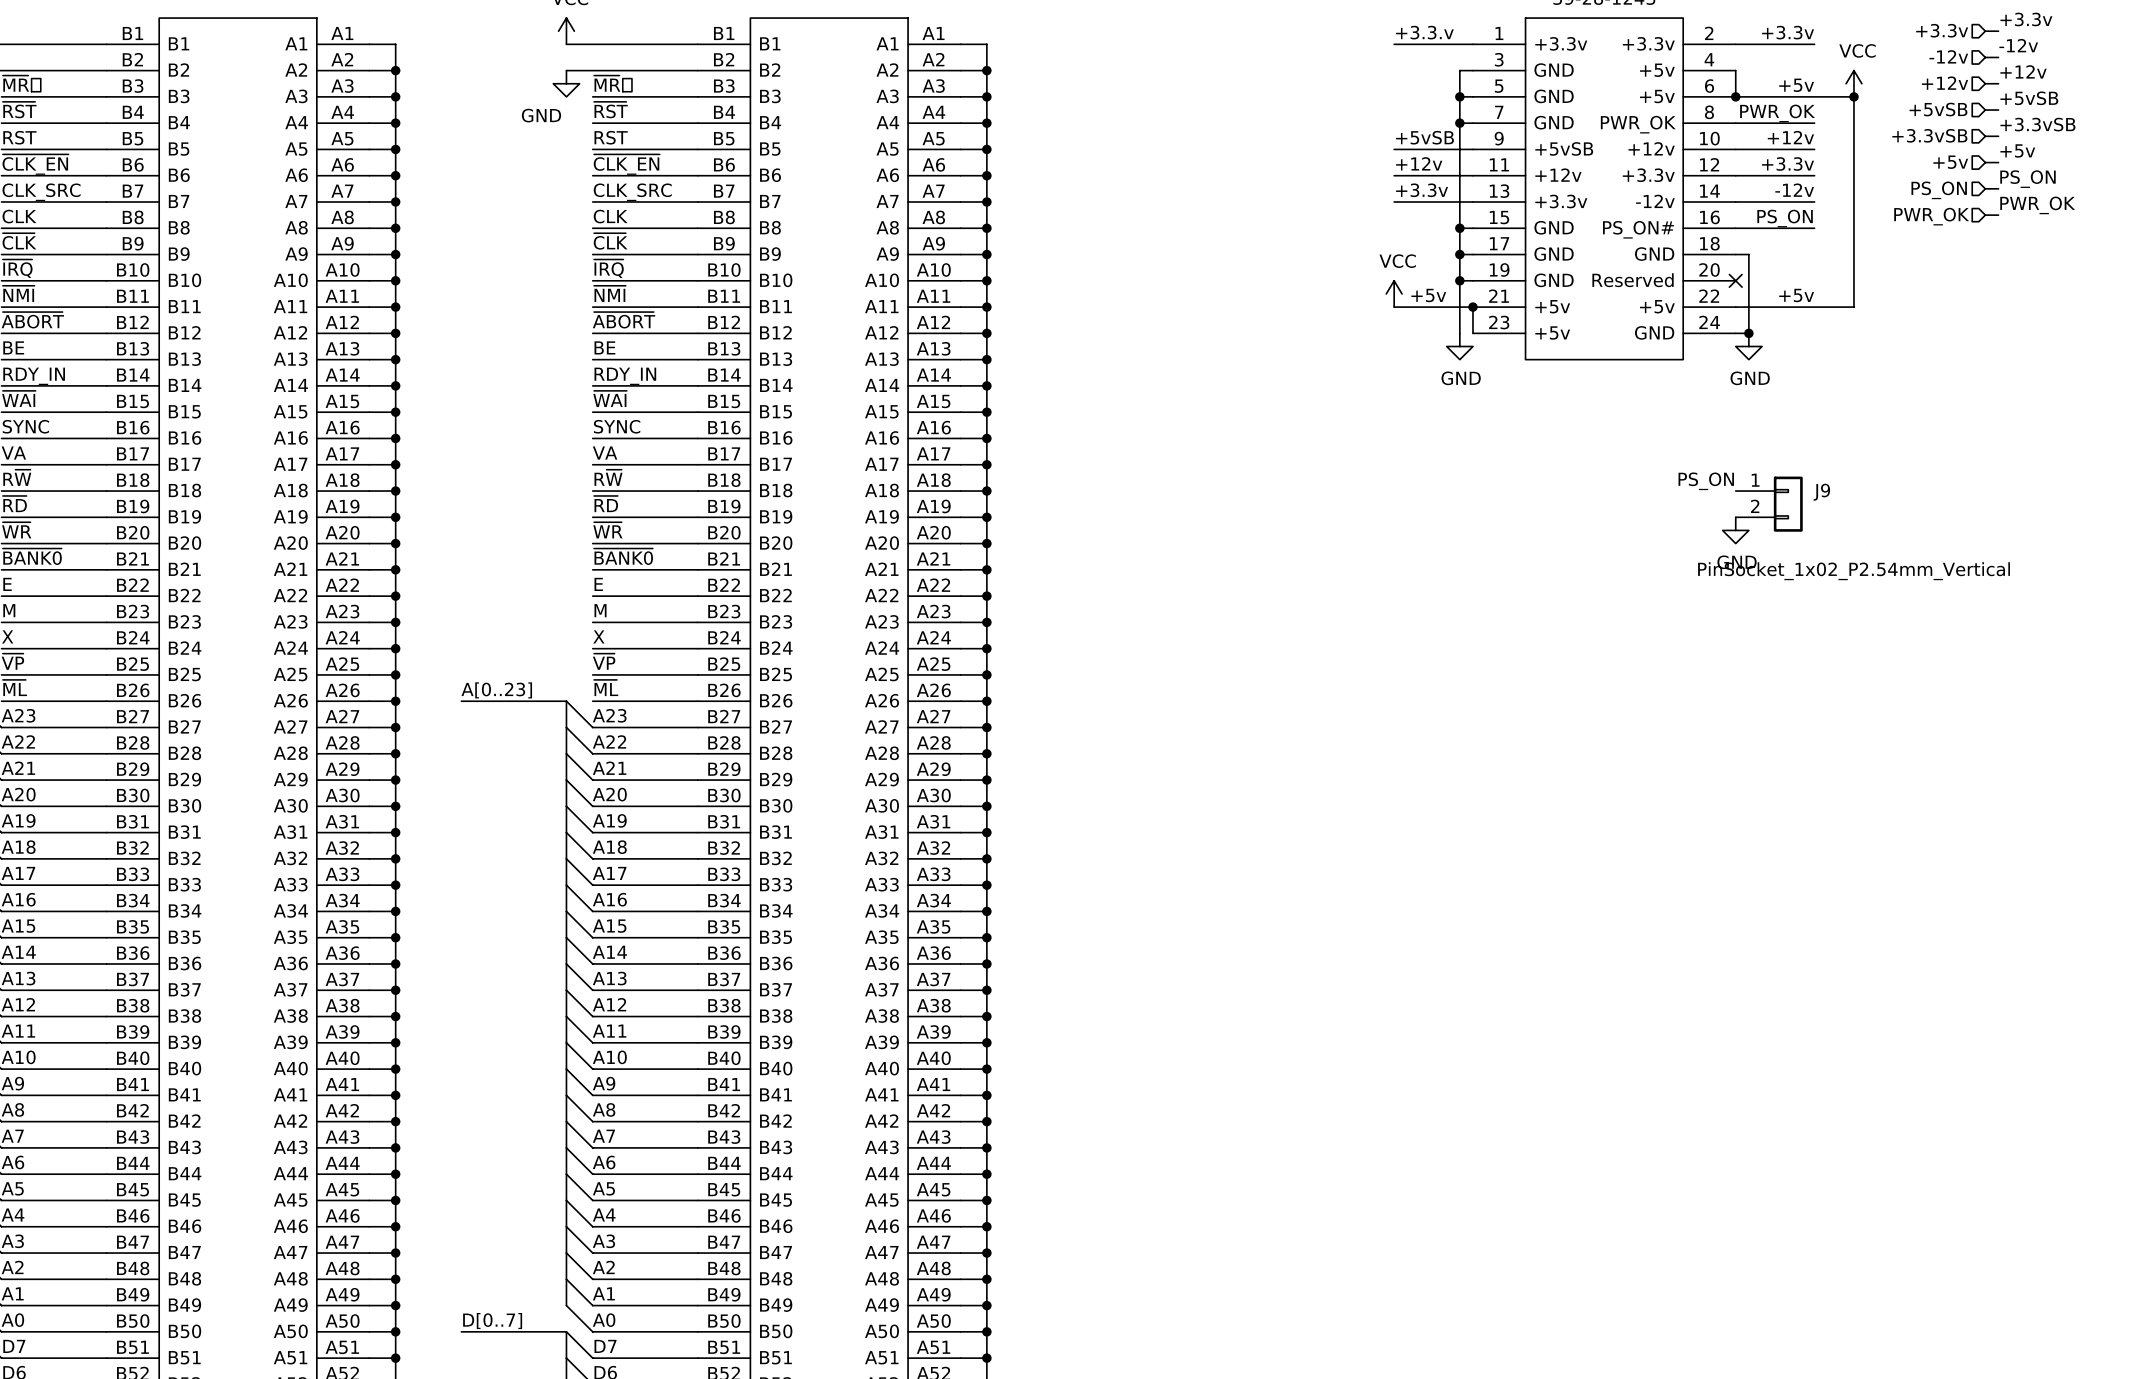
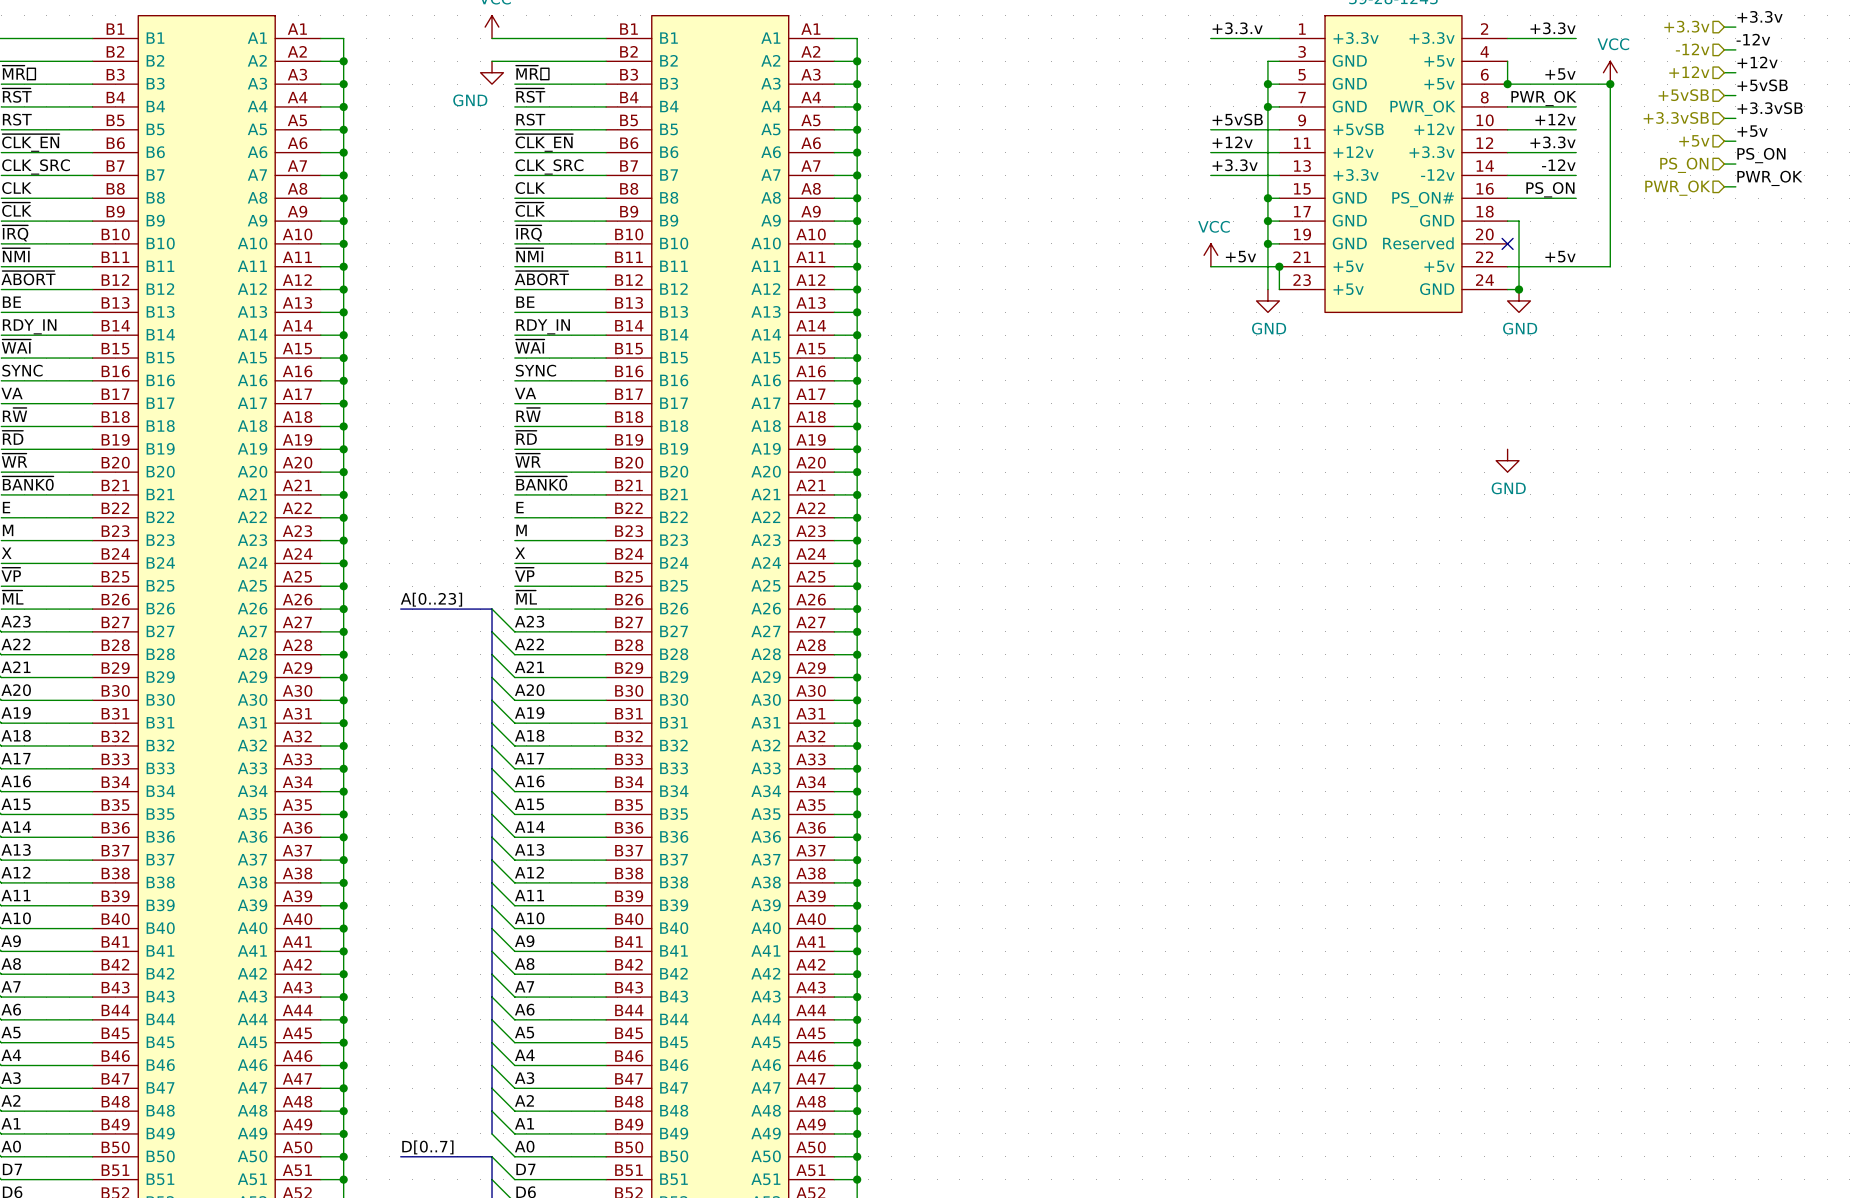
label: PS_ON (1706, 481) -> none
J9: PinSocket_1x02_P2.54mm_Vertical (1769, 504) -> none

